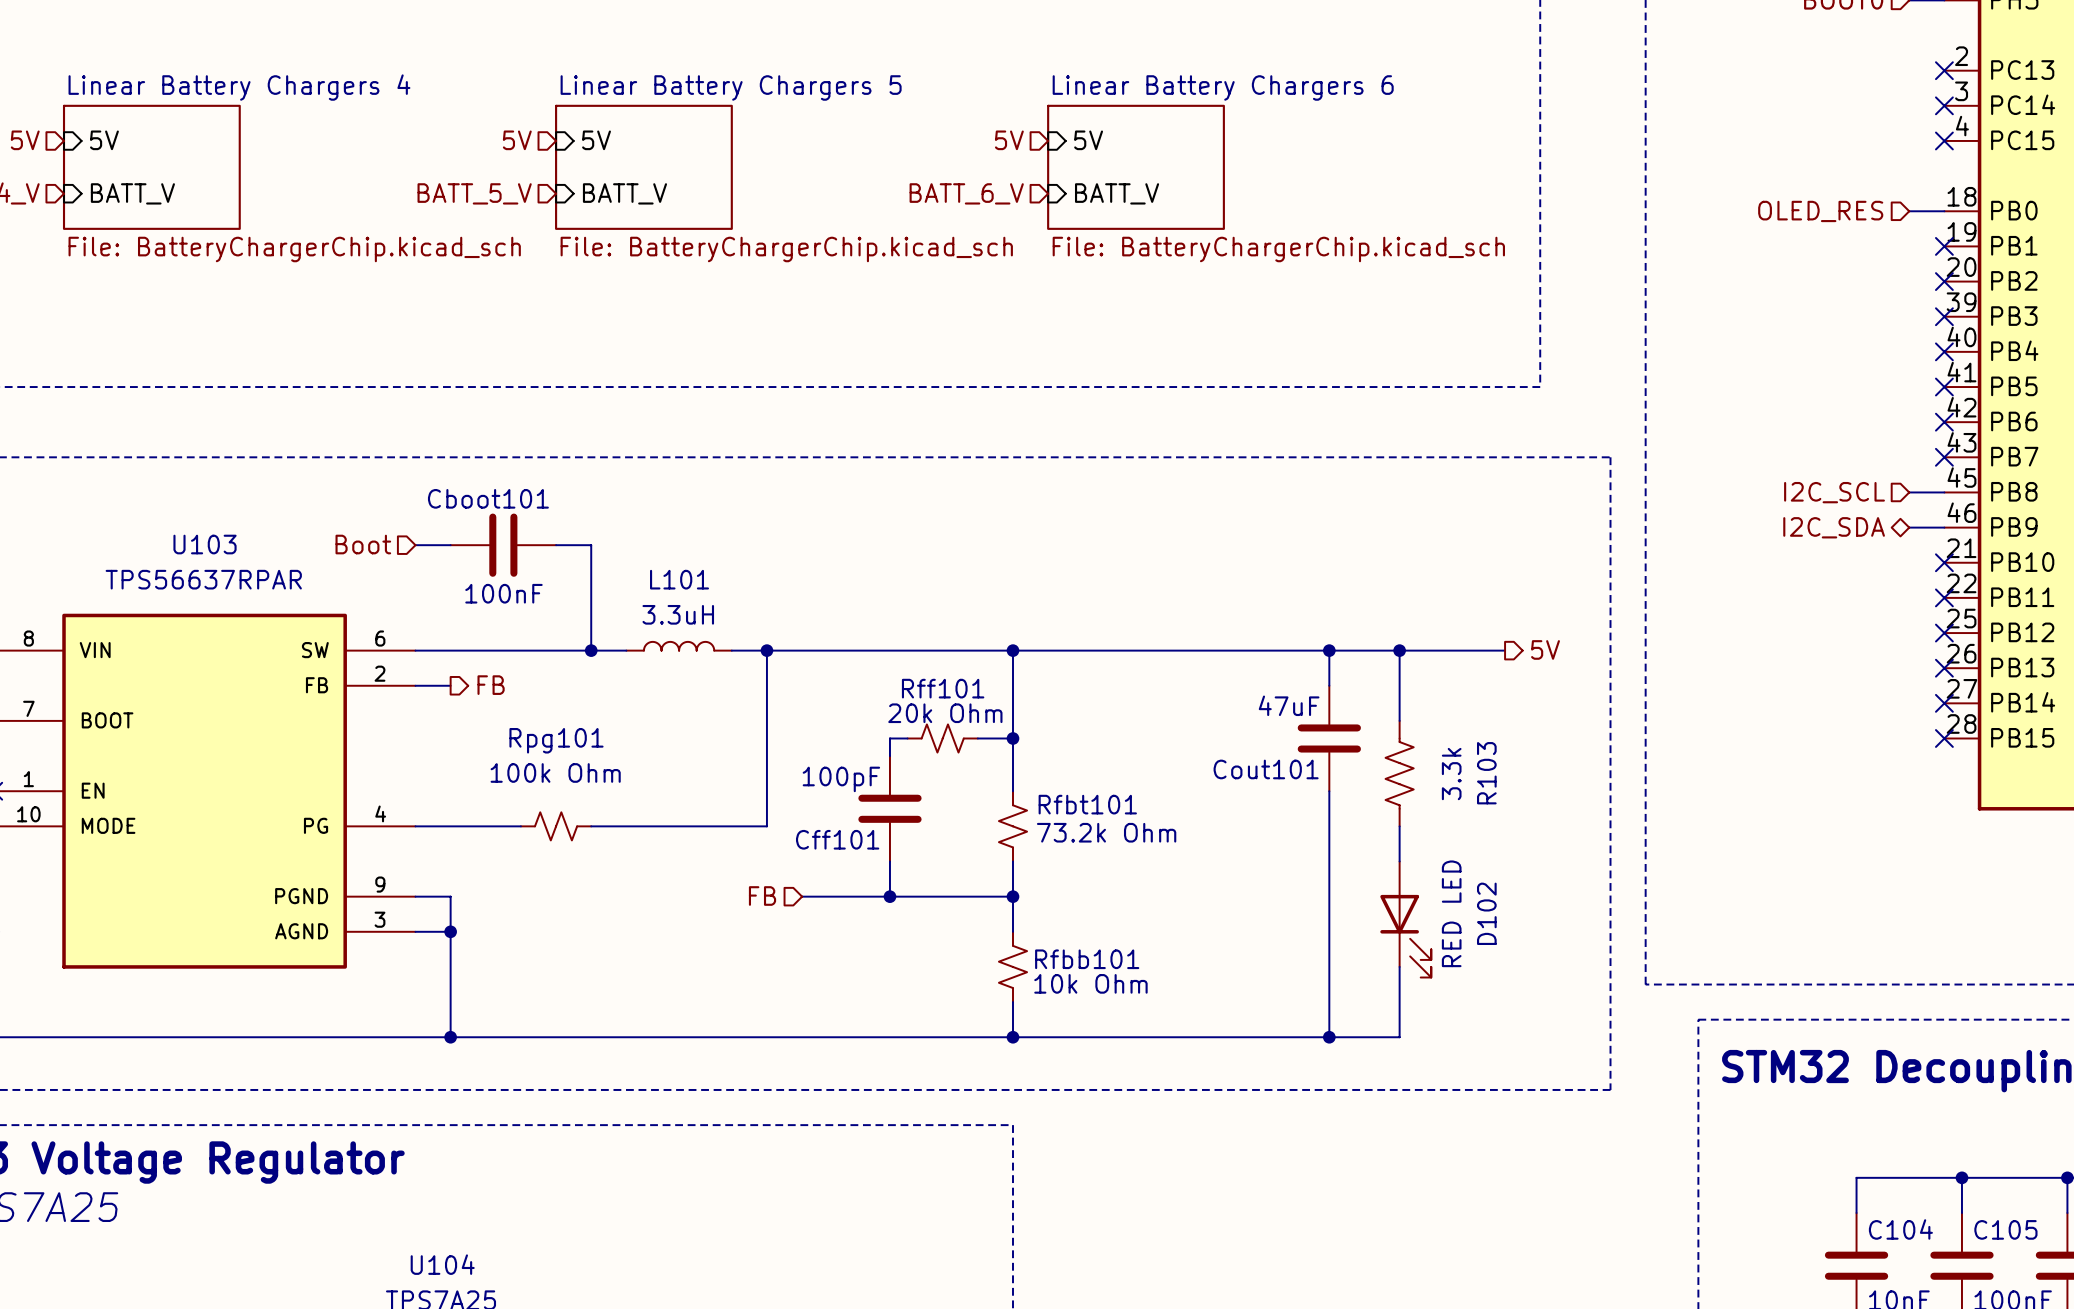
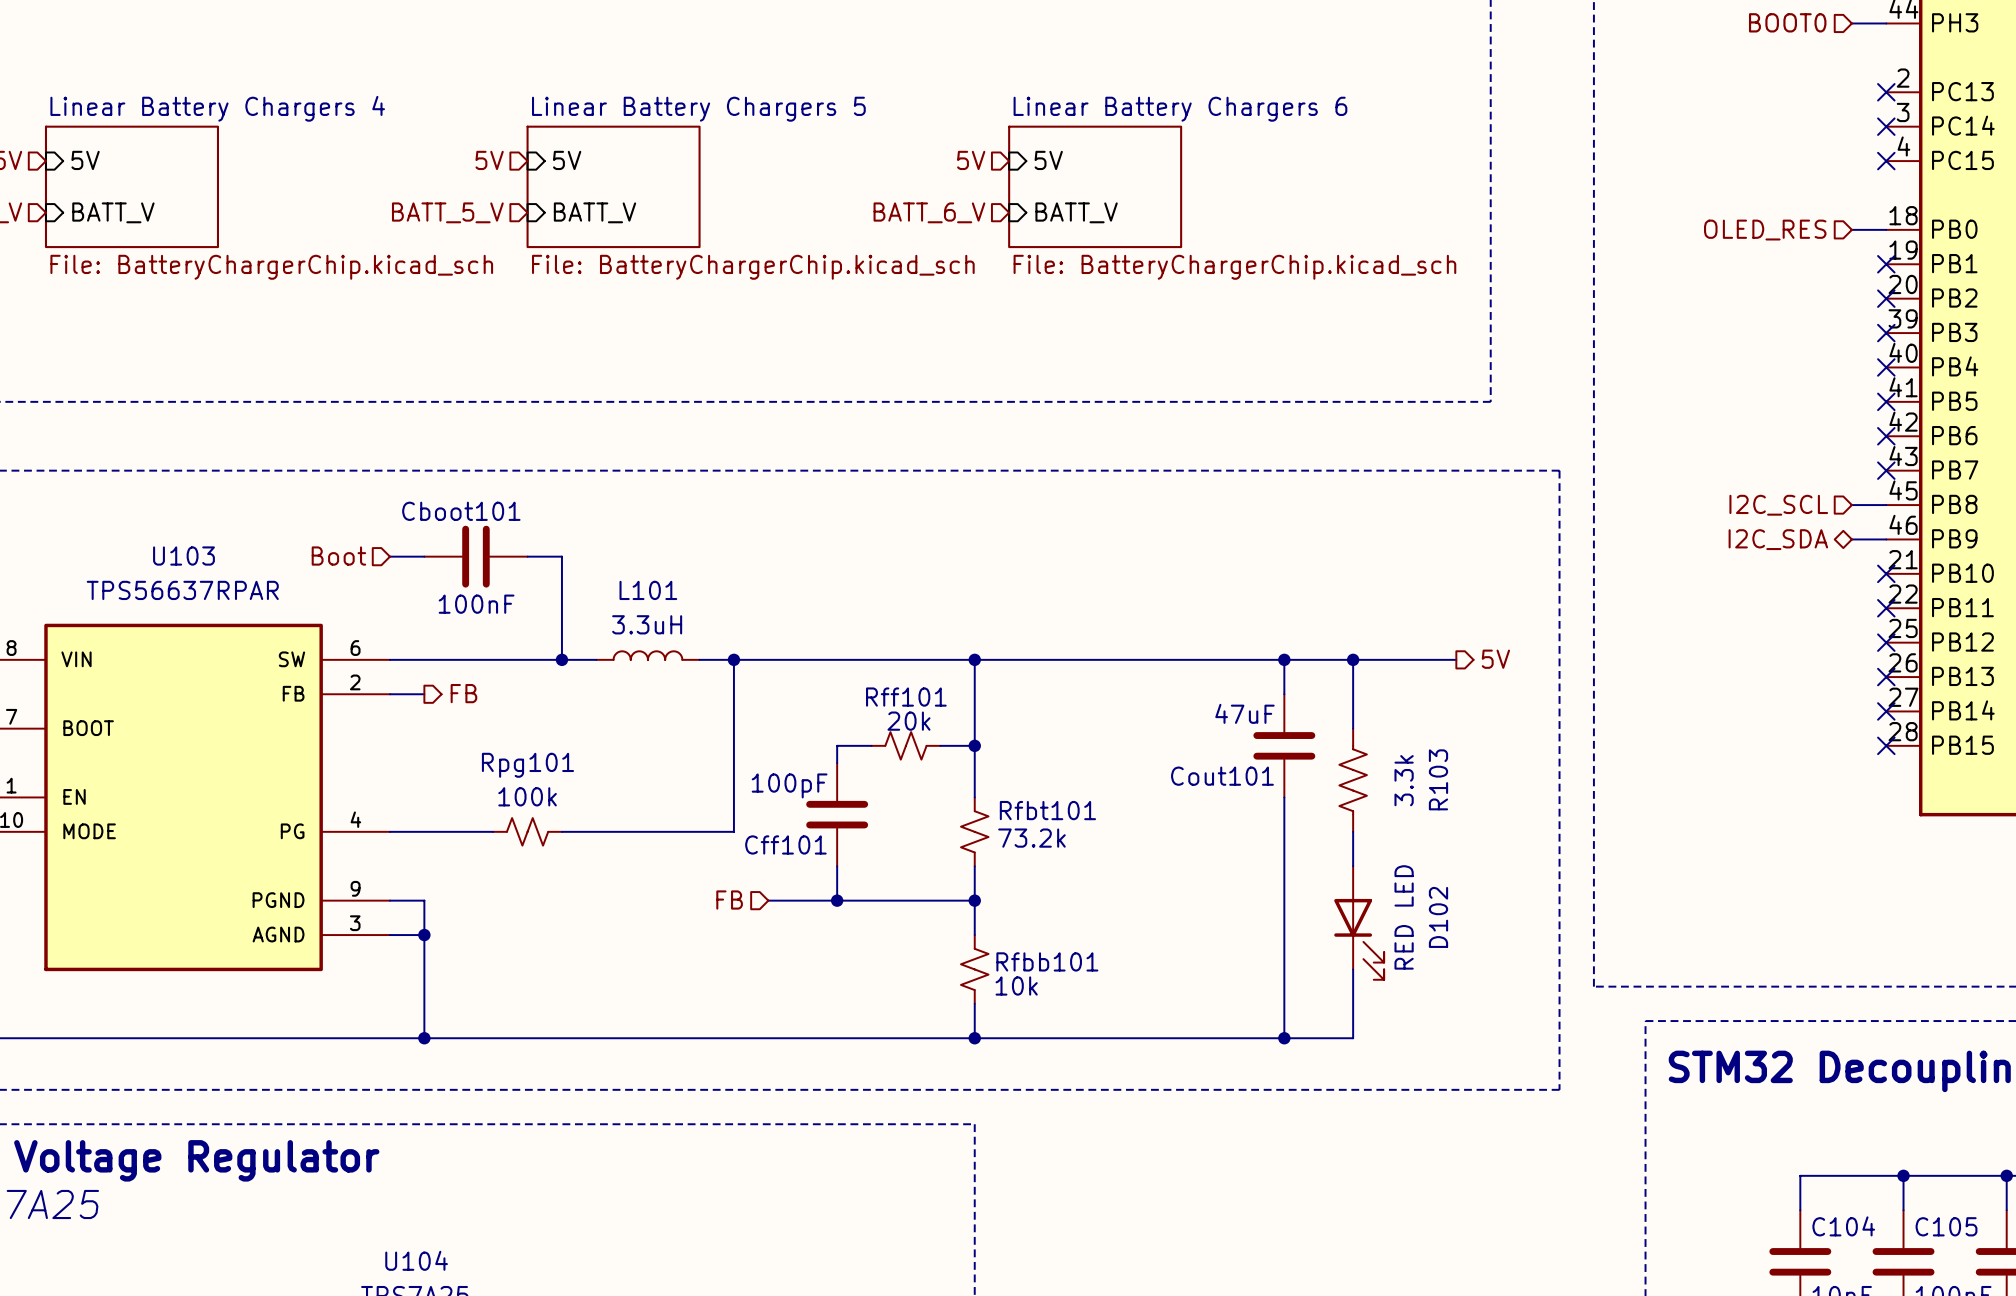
Rff101 value: 20k Ohm (945, 713) -> 20k (908, 721)
wire: (889, 738) (889, 756) -> (854, 745) (837, 745) (837, 763)
Rpg101 name position: Rpg101 (556, 740) -> Rpg101 (527, 765)
Rpg101 value: 100k Ohm (555, 772) -> 100k (527, 796)
Cff101 position: (889, 808) -> (837, 814)
Rfbt101 value: 73.2k Ohm (1106, 832) -> 73.2k (1031, 838)
wire: (889, 861) (889, 896) -> (837, 866) (837, 900)
junction position: (889, 896) -> (837, 900)
Rfbb101 value: 10k Ohm (1090, 983) -> 10k (1016, 986)

